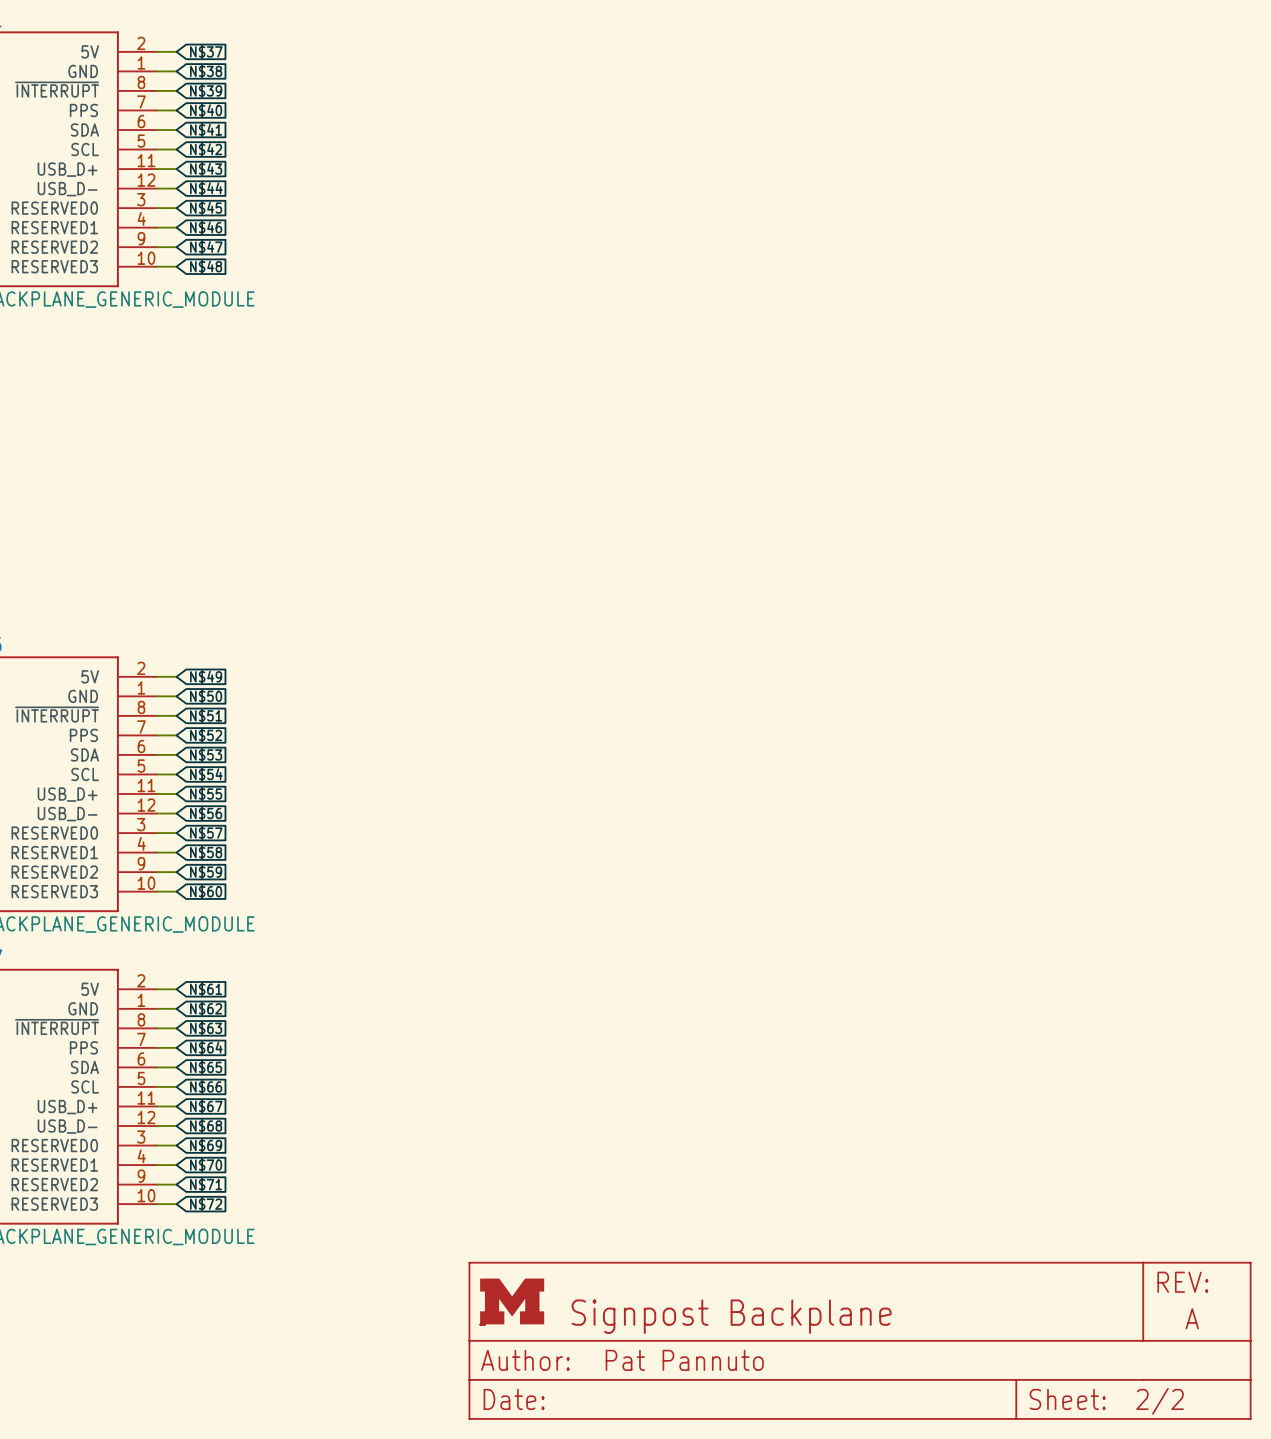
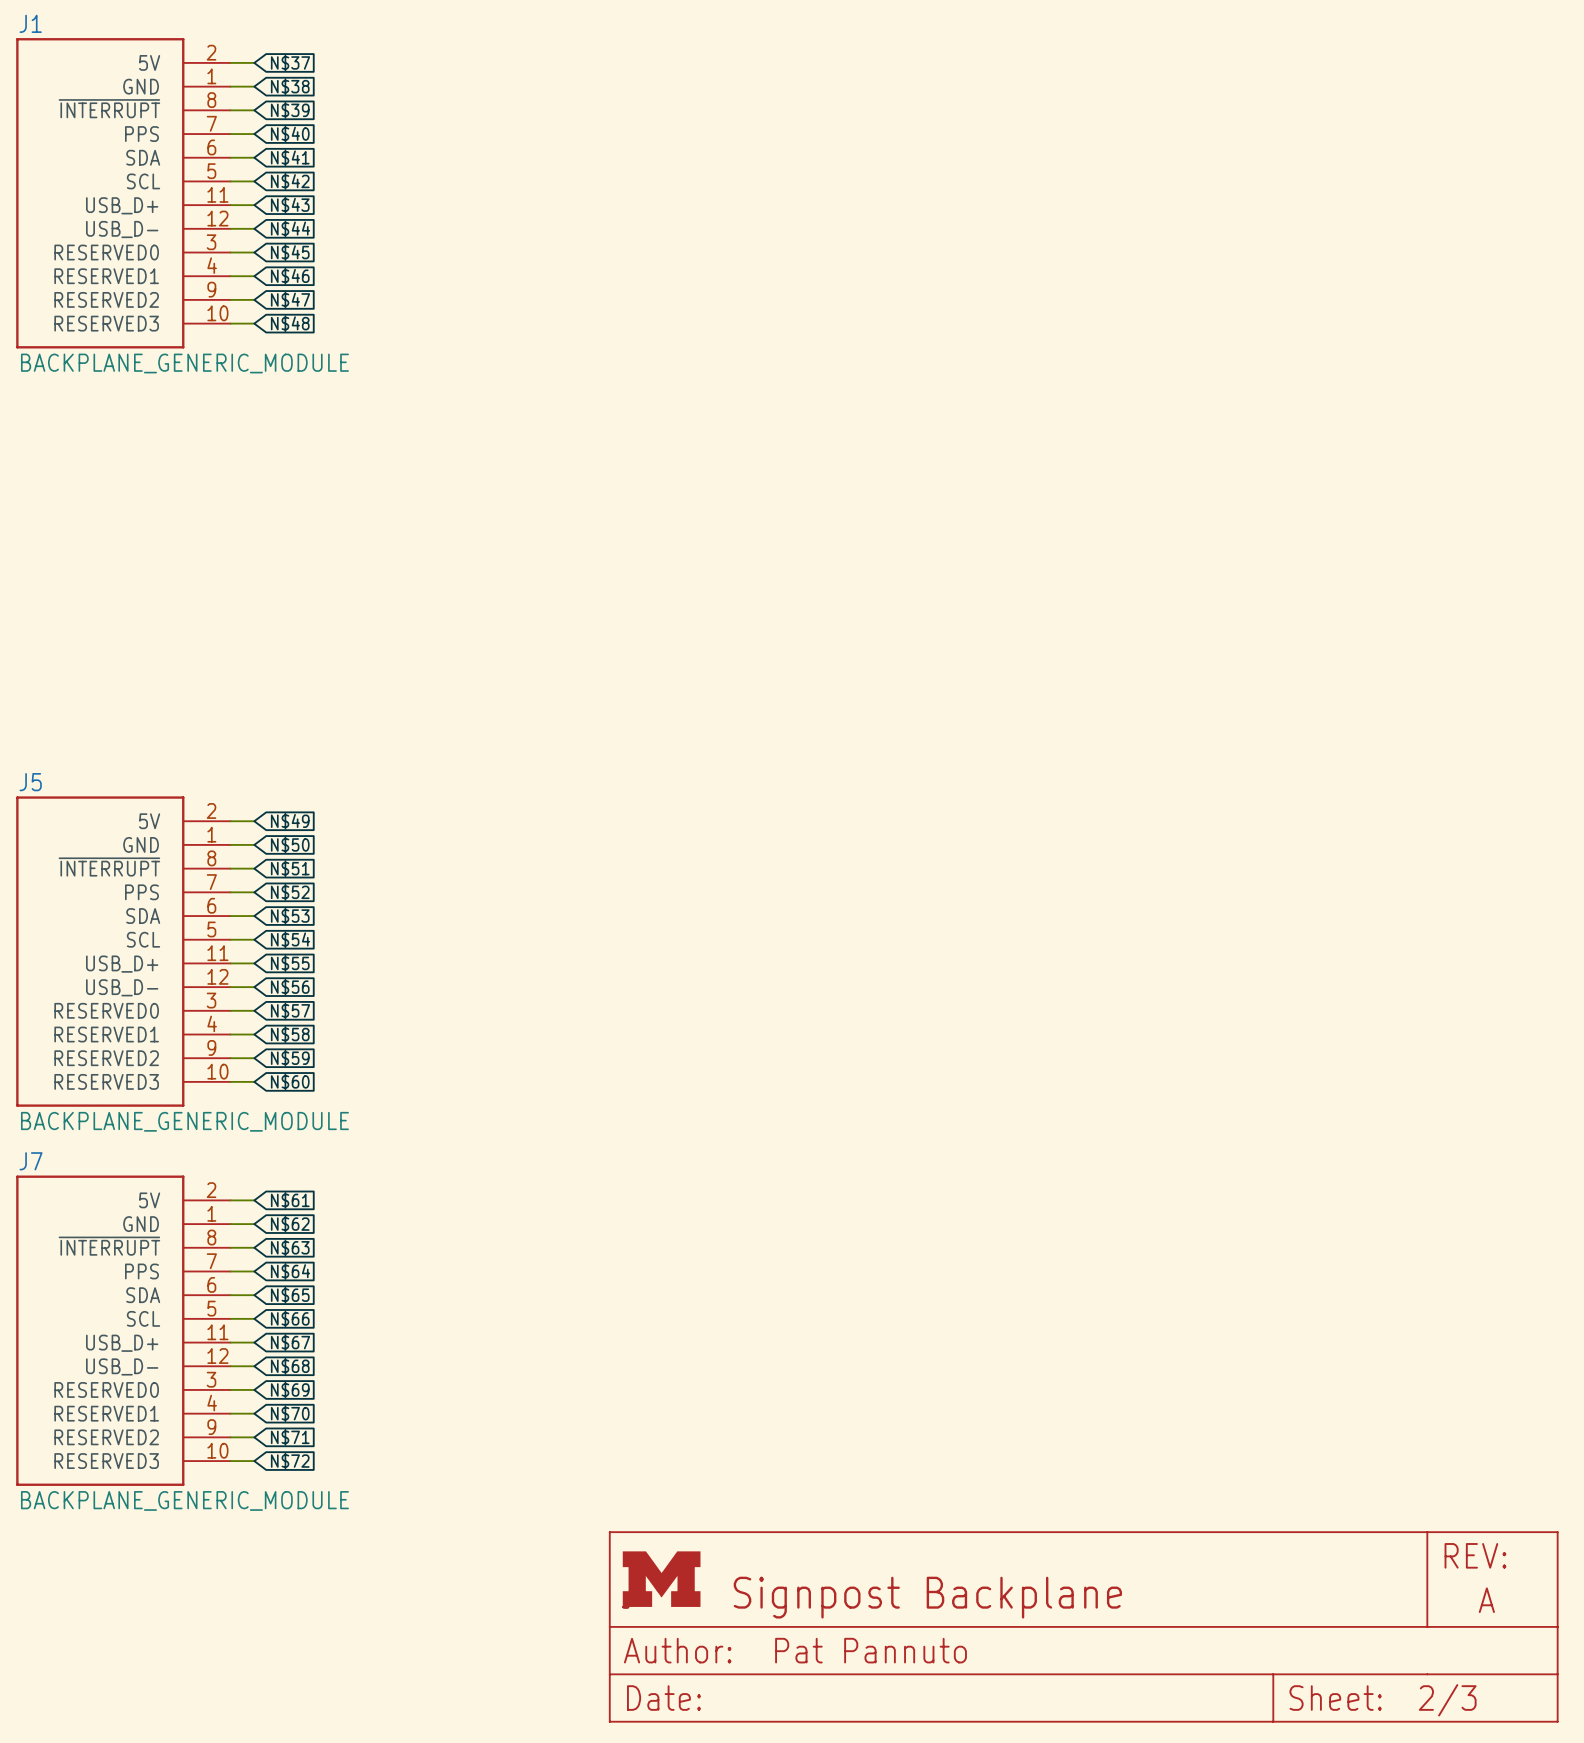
part text: 2/2 (1160, 1401) -> 2/3 (1447, 1700)

